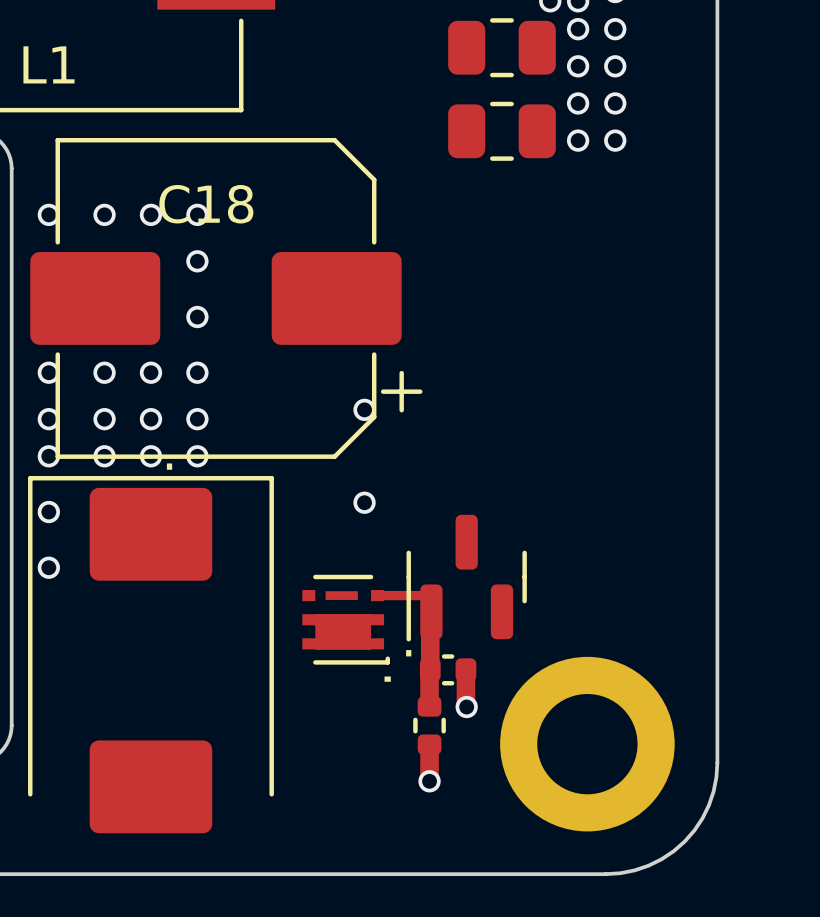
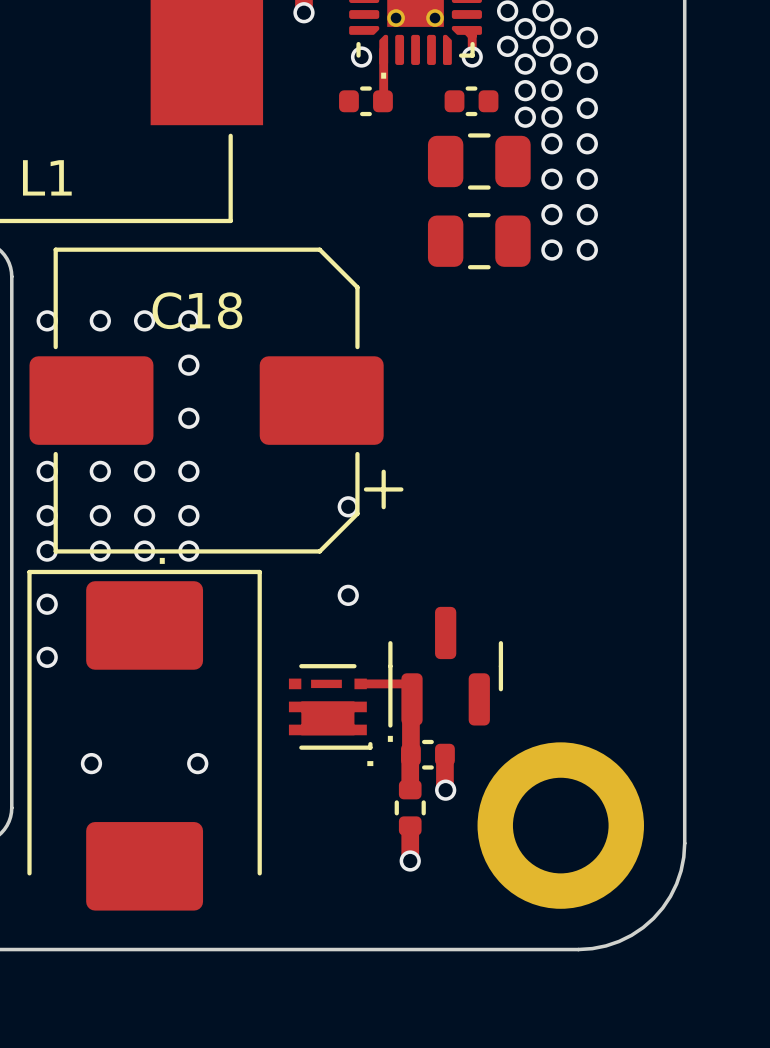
via: none -> (91, 763)
via: none -> (197, 763)

